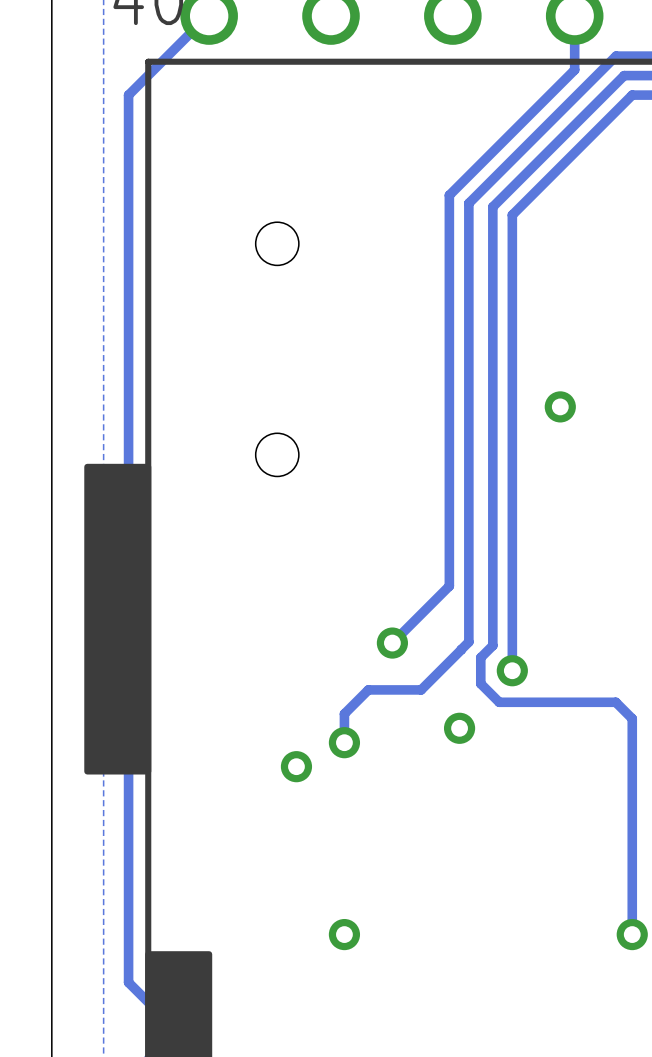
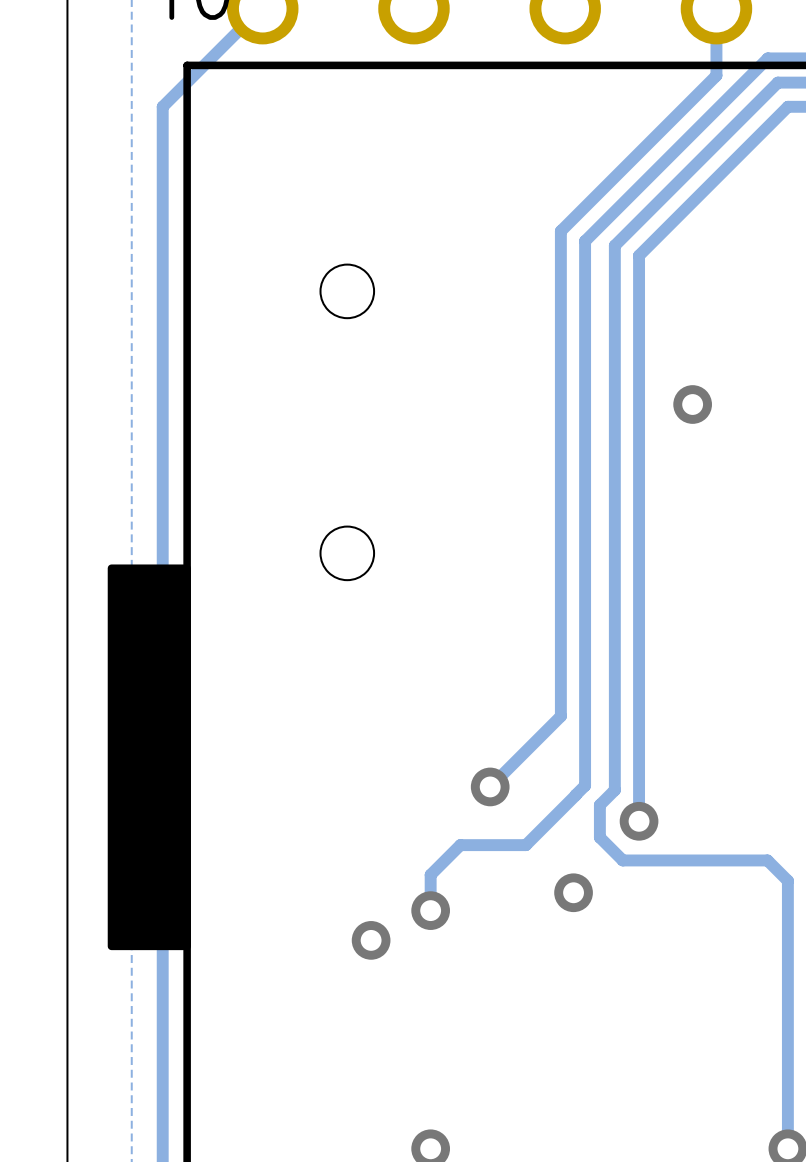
via position: (560, 406) -> (692, 404)

